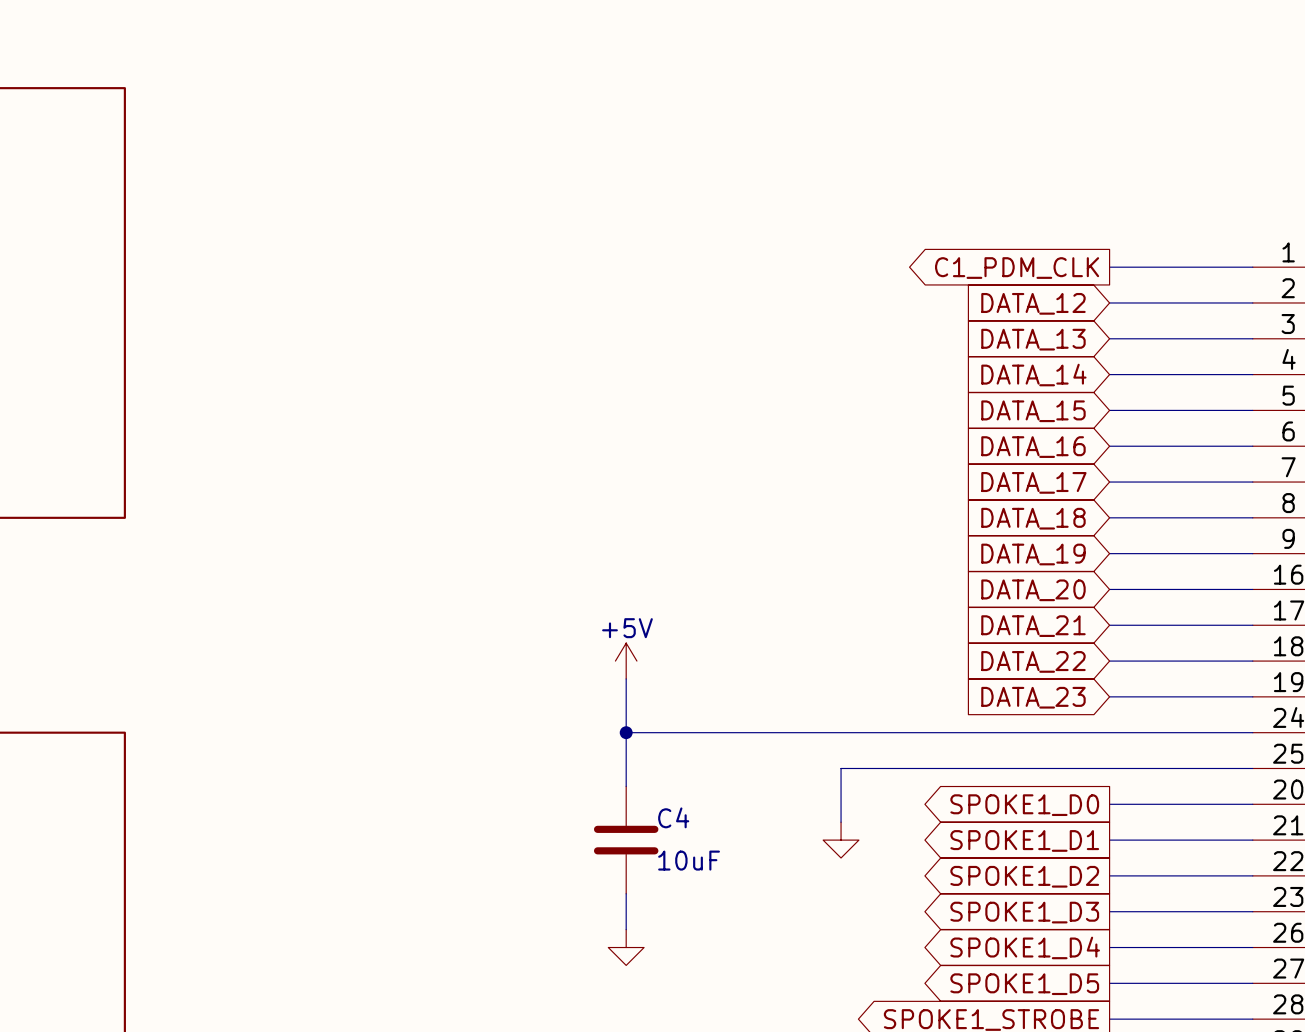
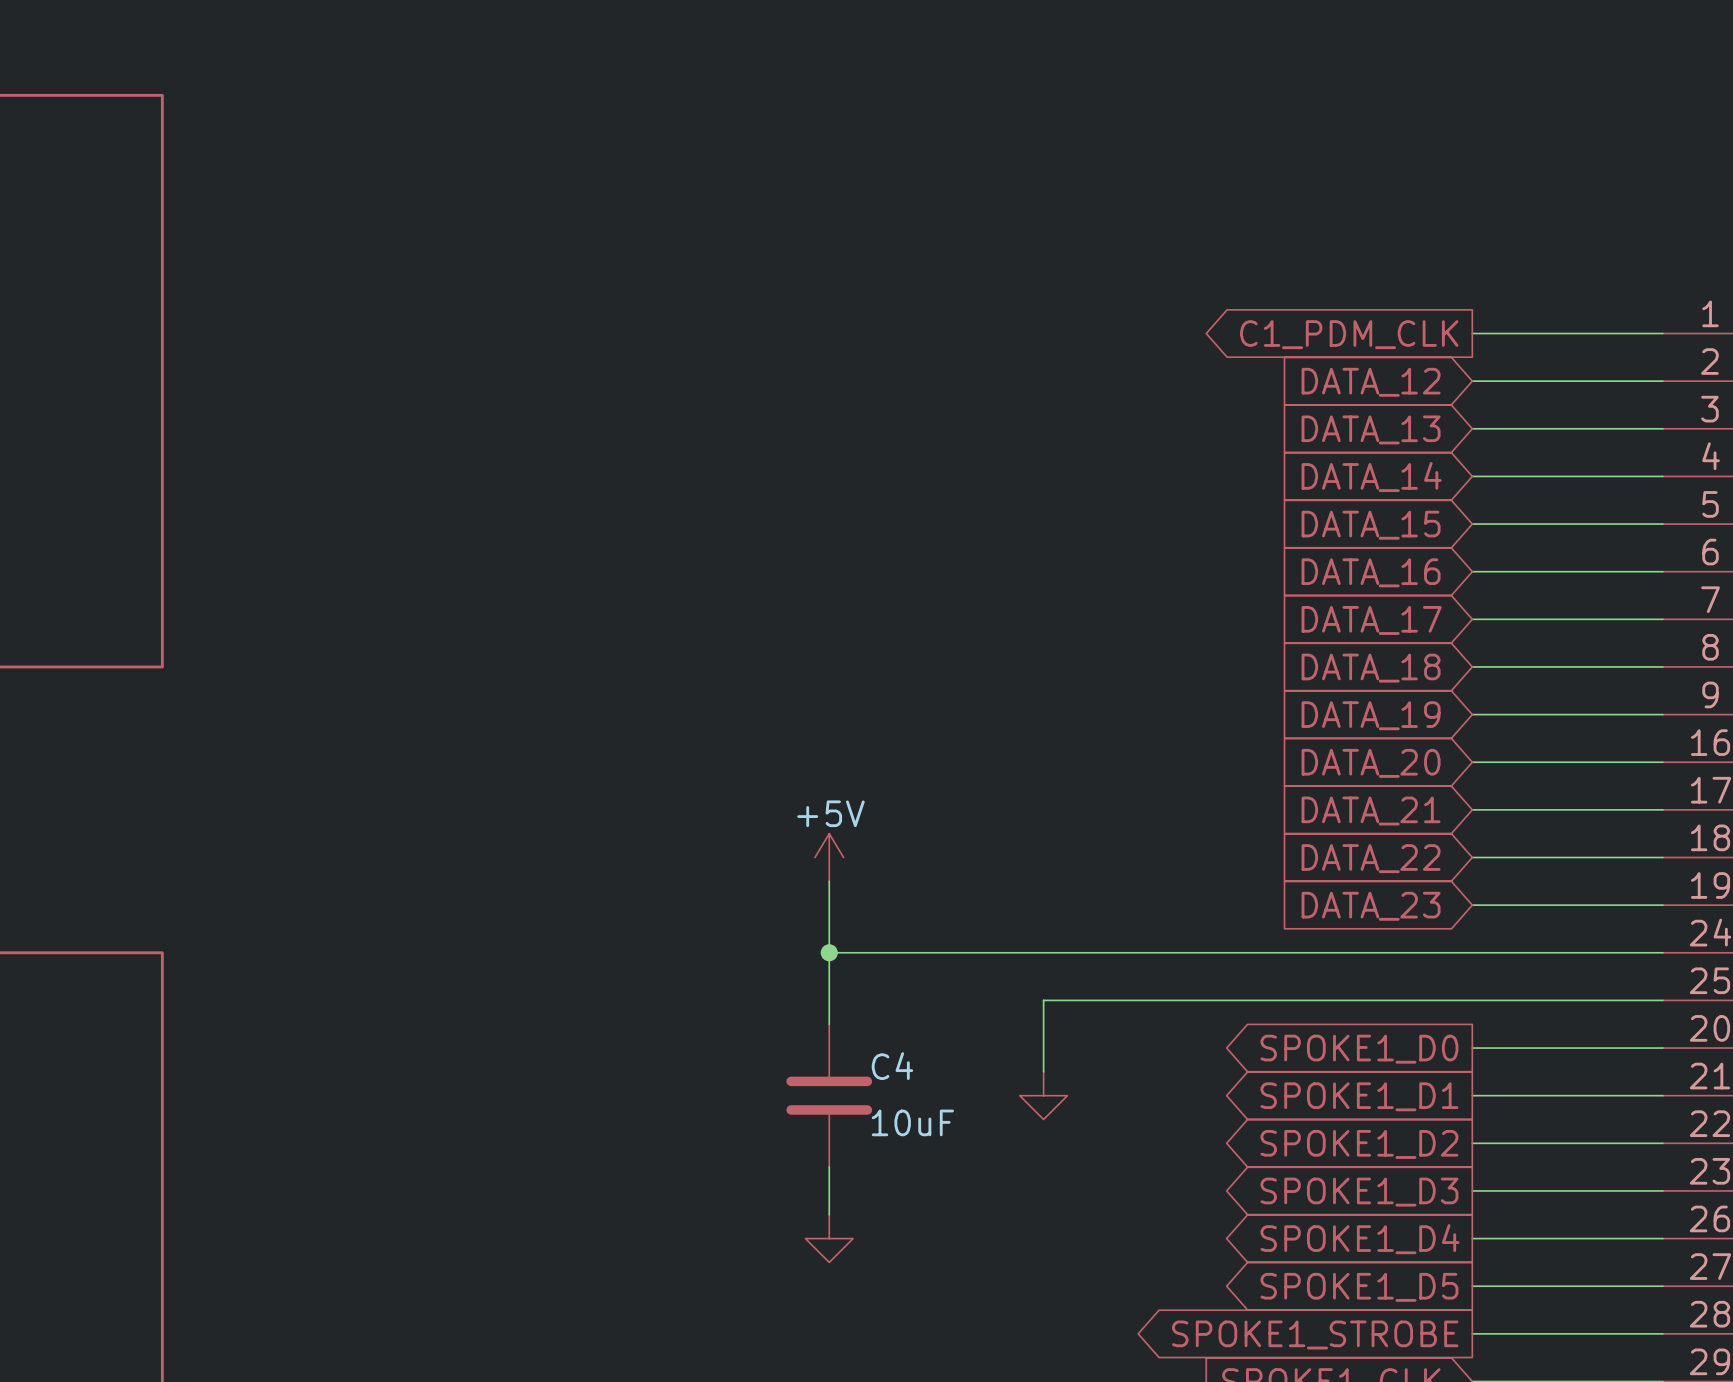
wire: (841, 768) (841, 822) -> (1115, 1000) (1043, 1000) (1043, 1071)
power symbol position: (841, 840) -> (1043, 1095)

